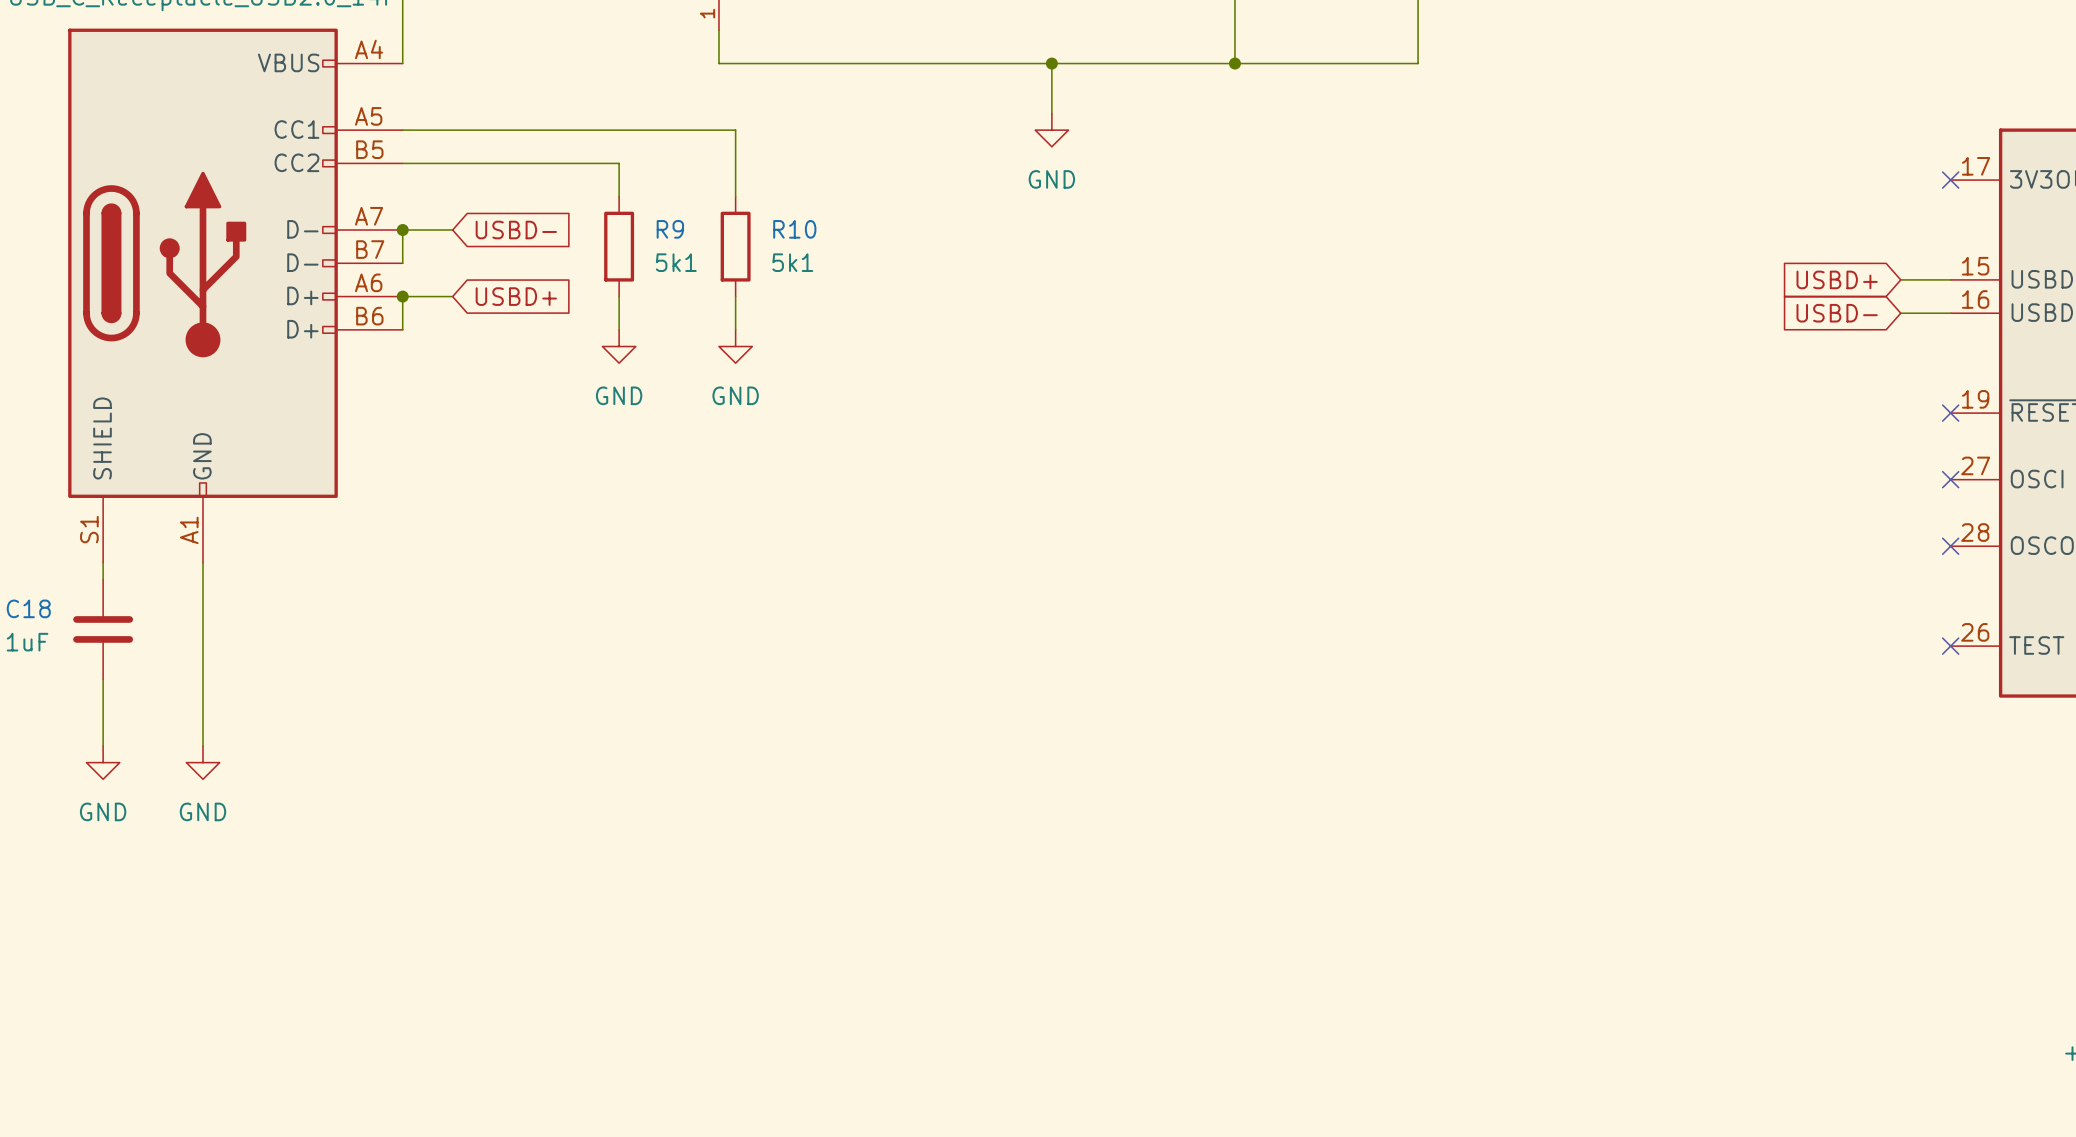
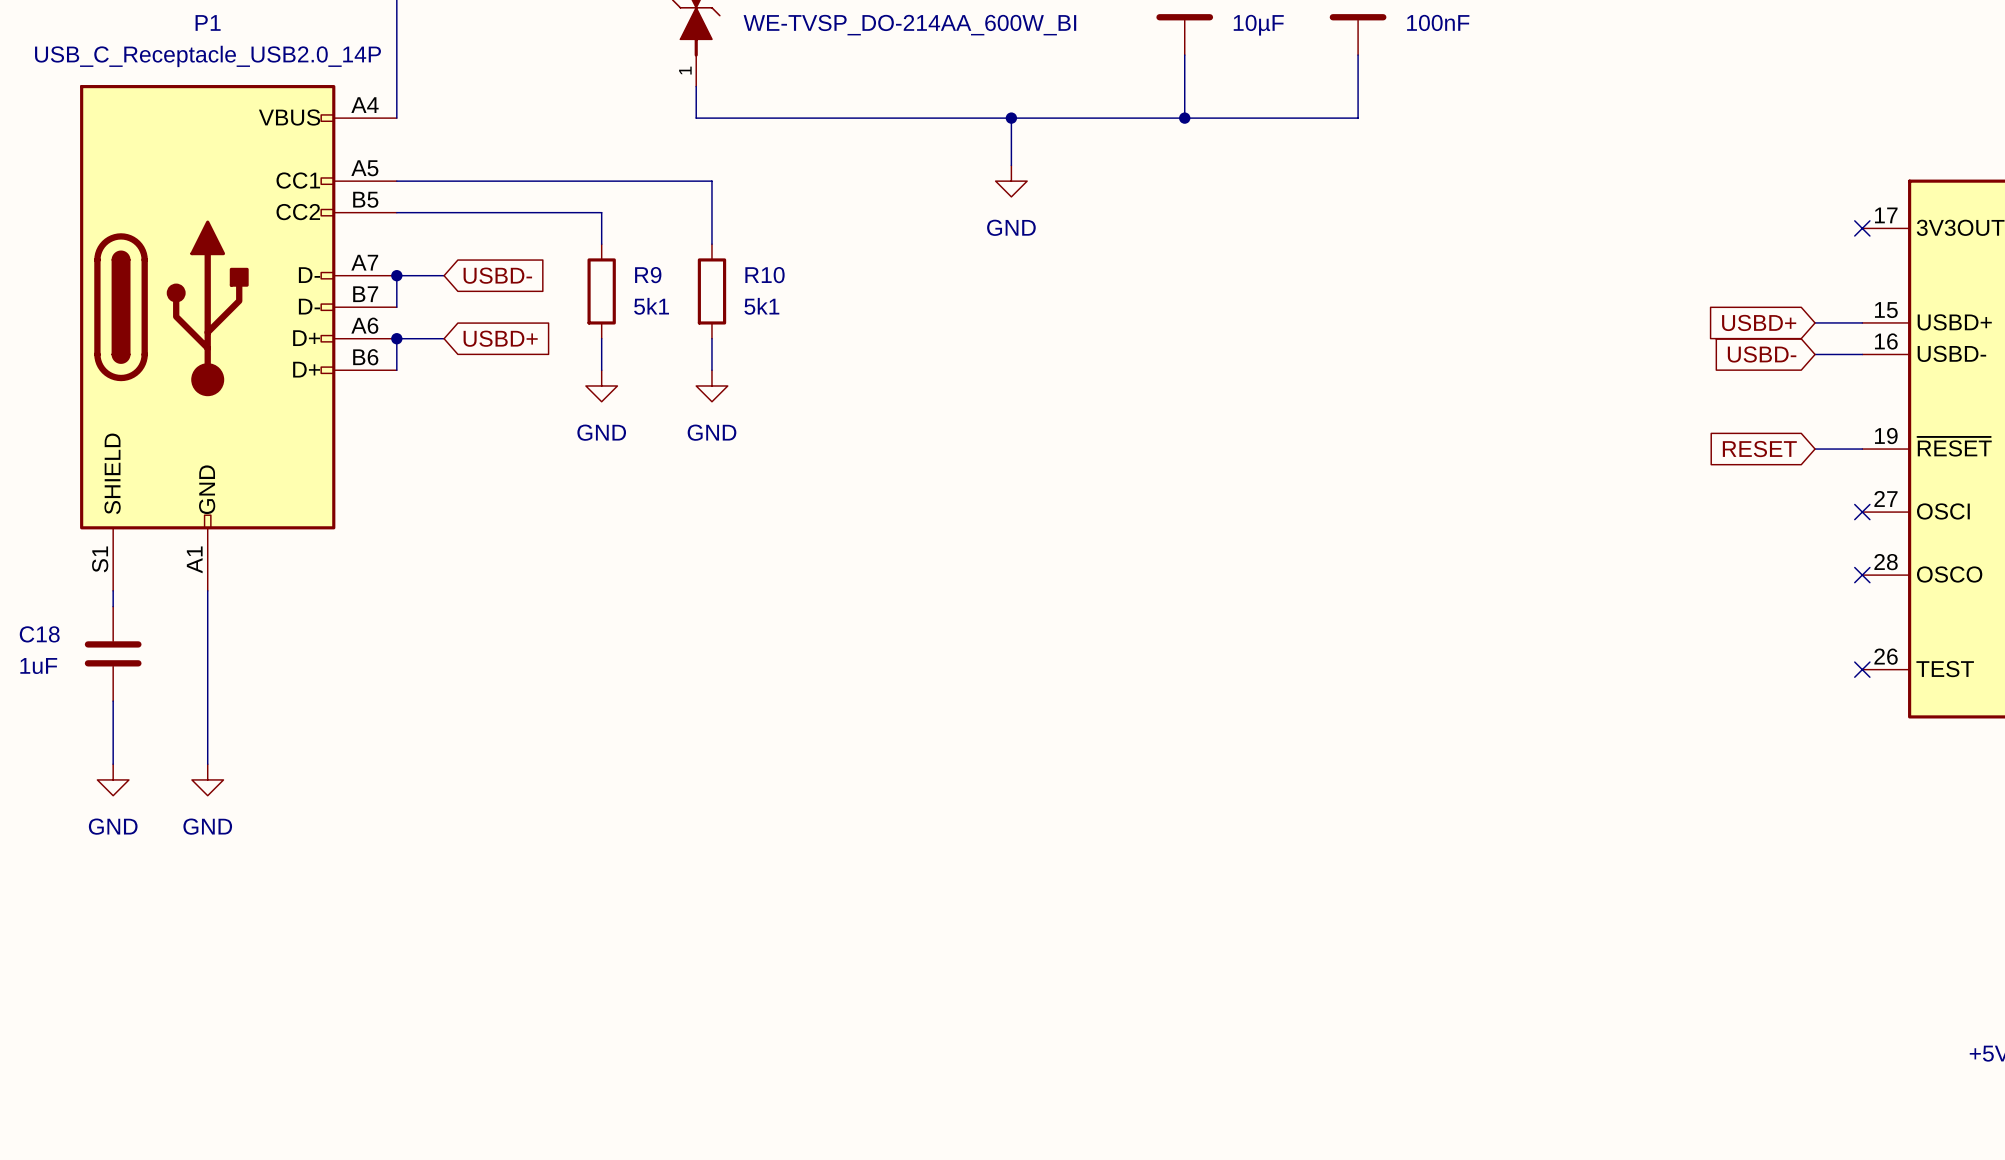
global label: none -> RESET (1759, 449)
wire: none -> (1815, 449) (1862, 449)
no-connect mark: (1950, 413) -> none

